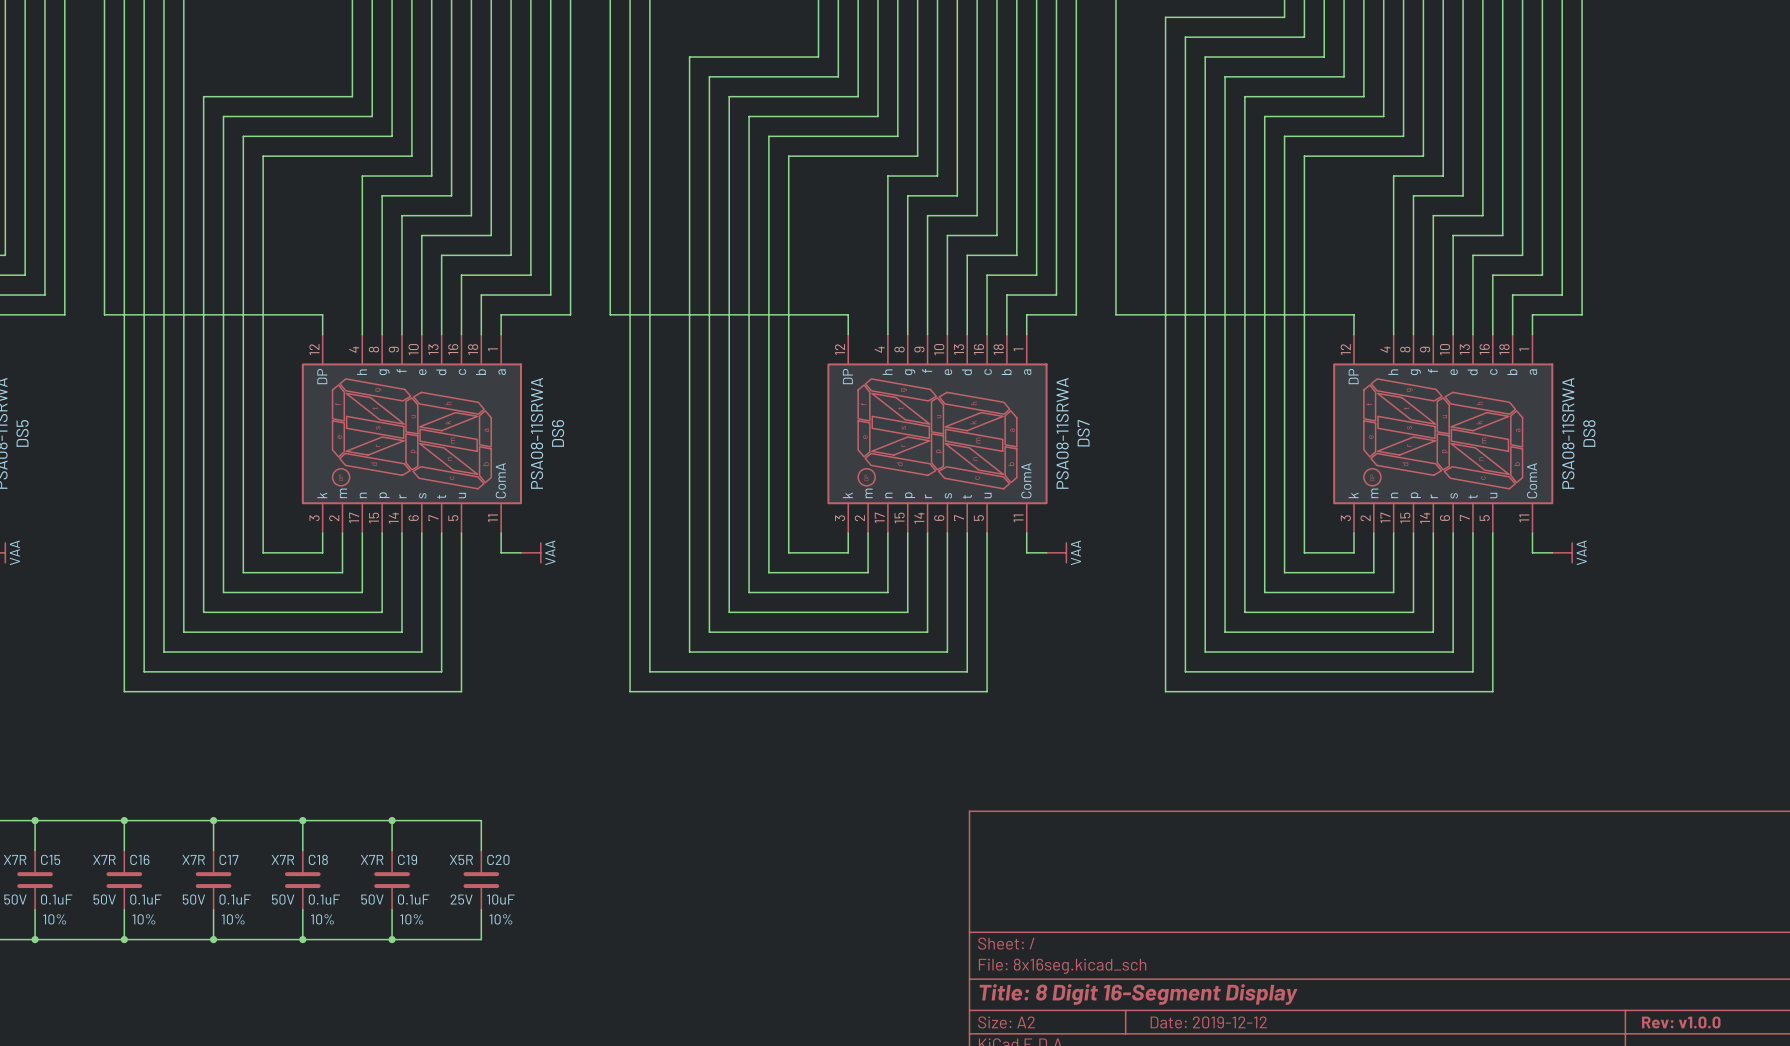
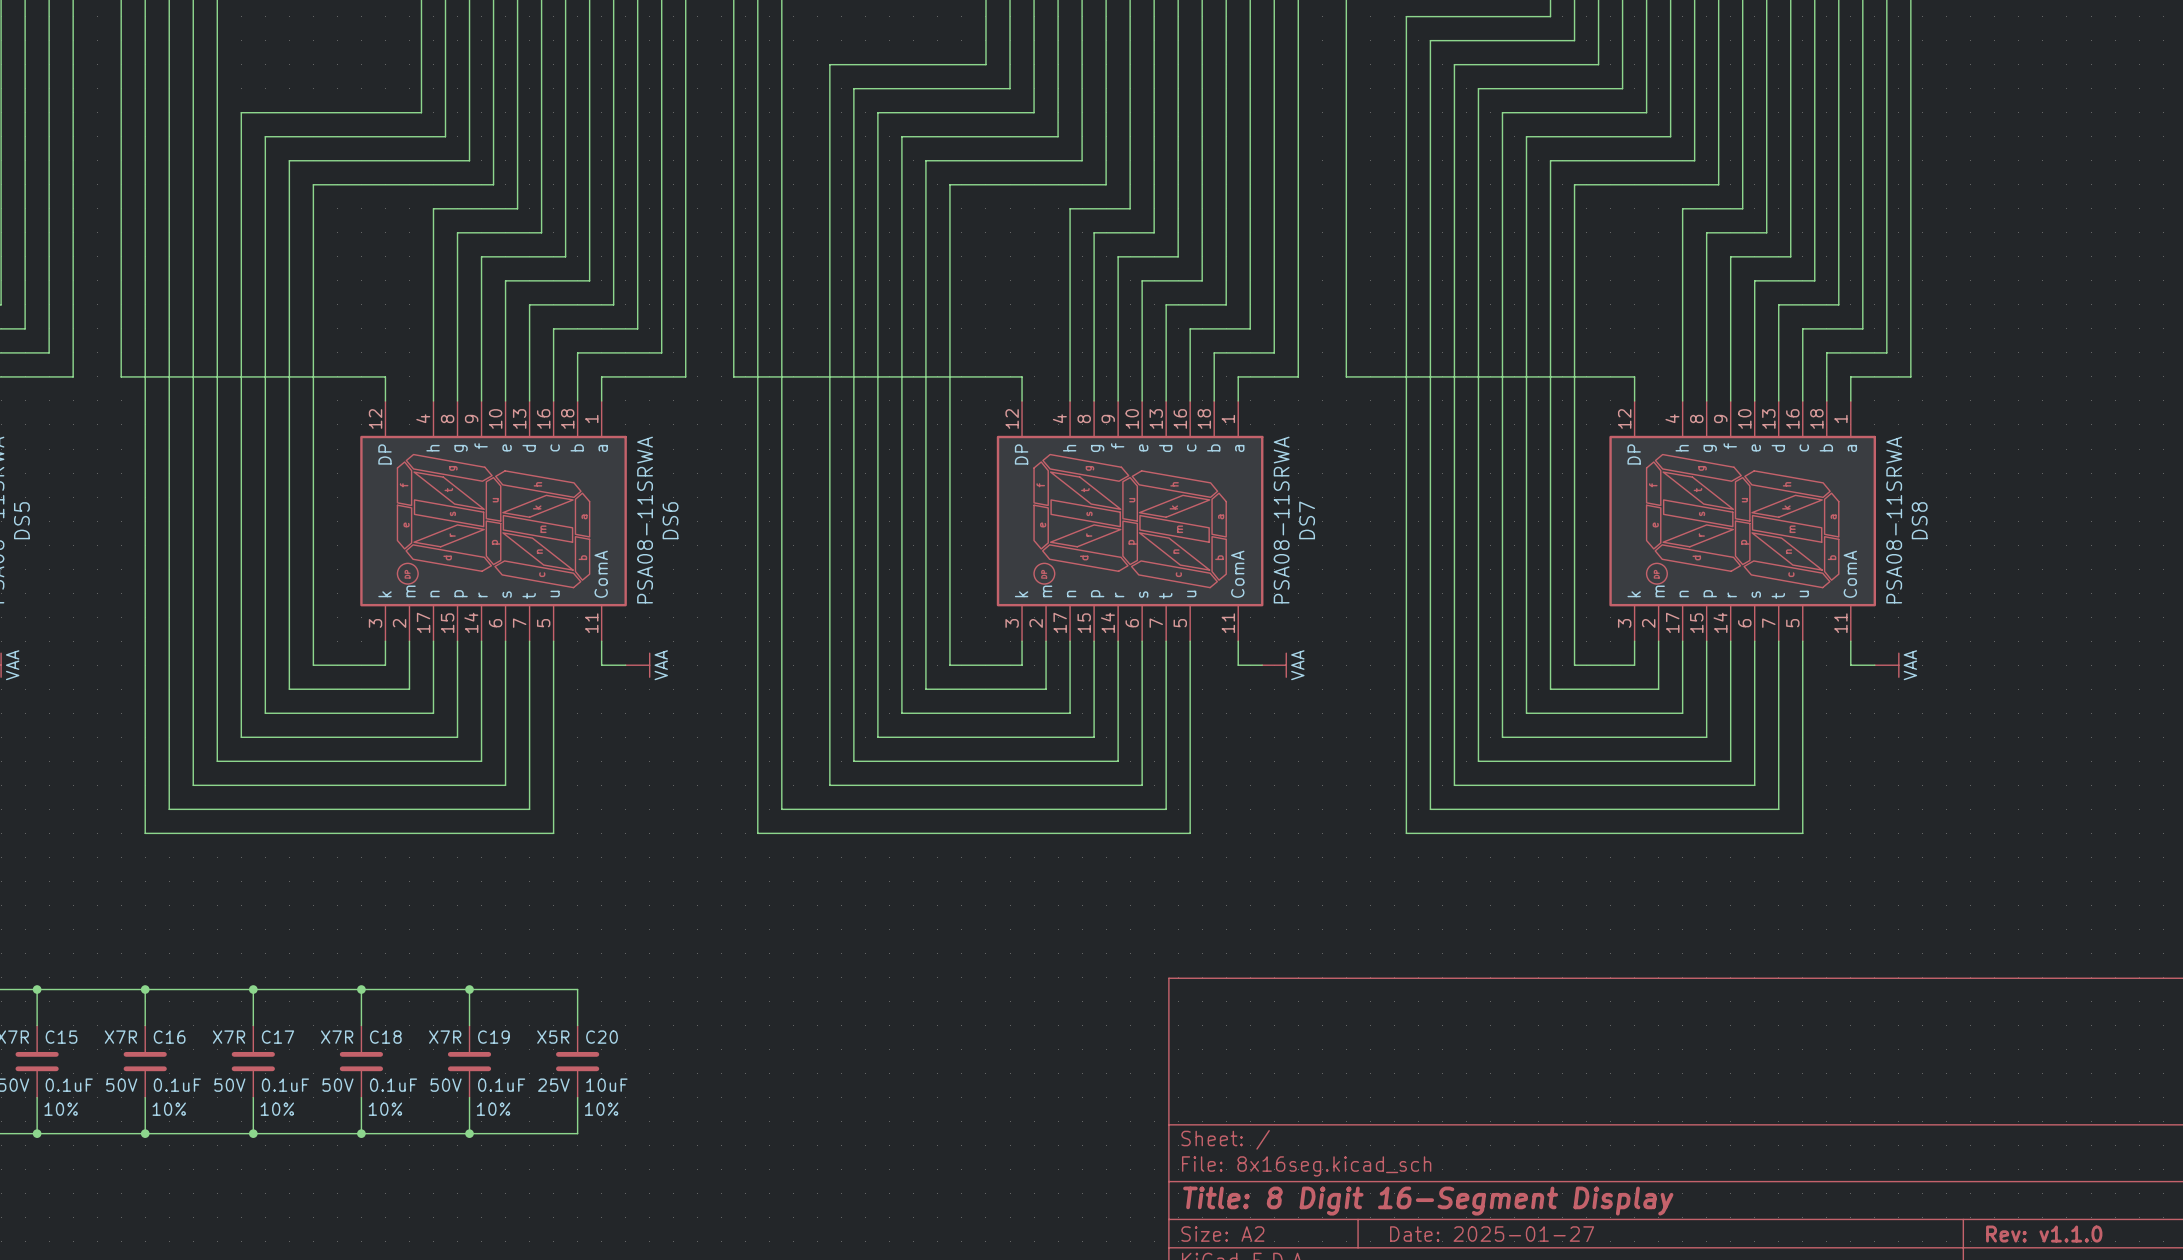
title block: Date: 2019-12-12 (1208, 1022) -> Date: 2025-01-27 (1492, 1234)
title block: Rev: v1.0.0 (1681, 1022) -> Rev: v1.1.0 (2044, 1234)

